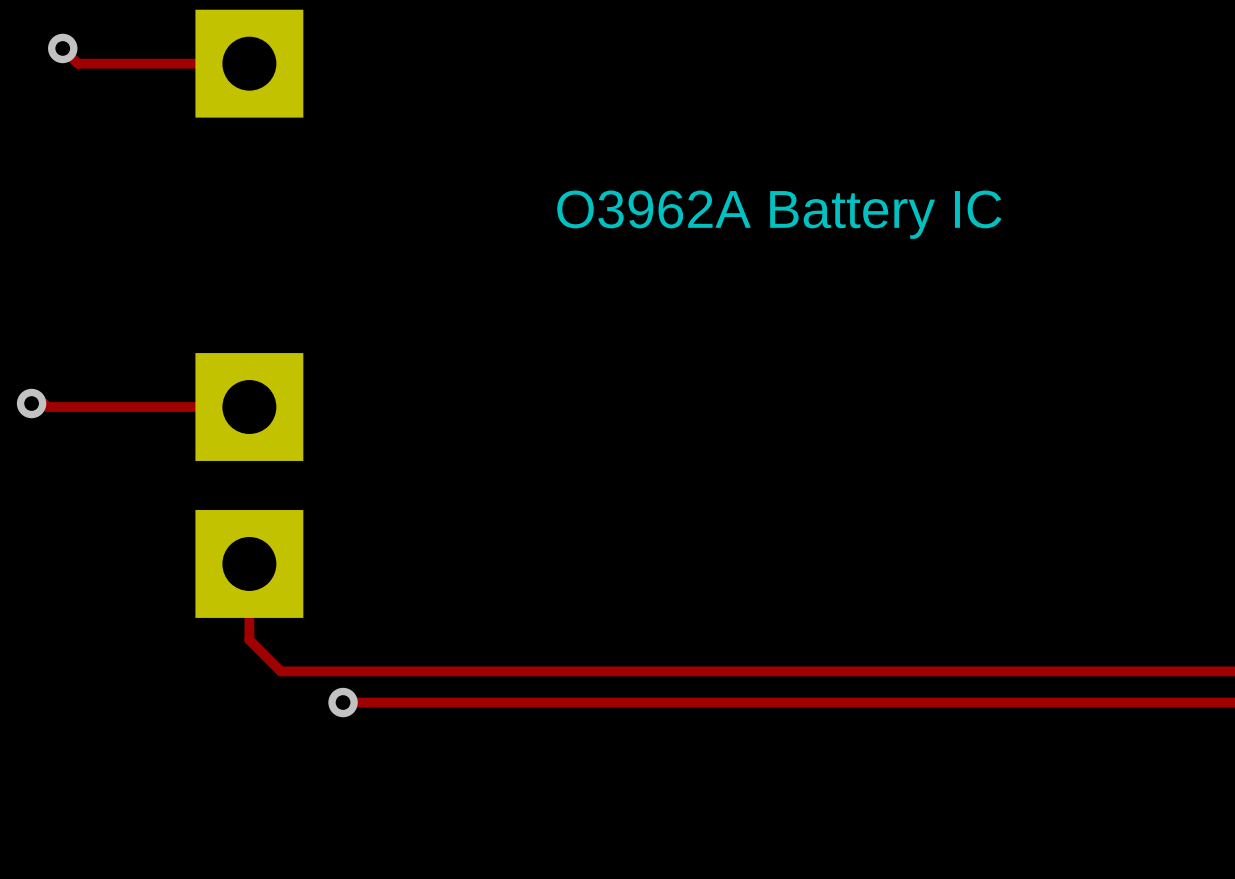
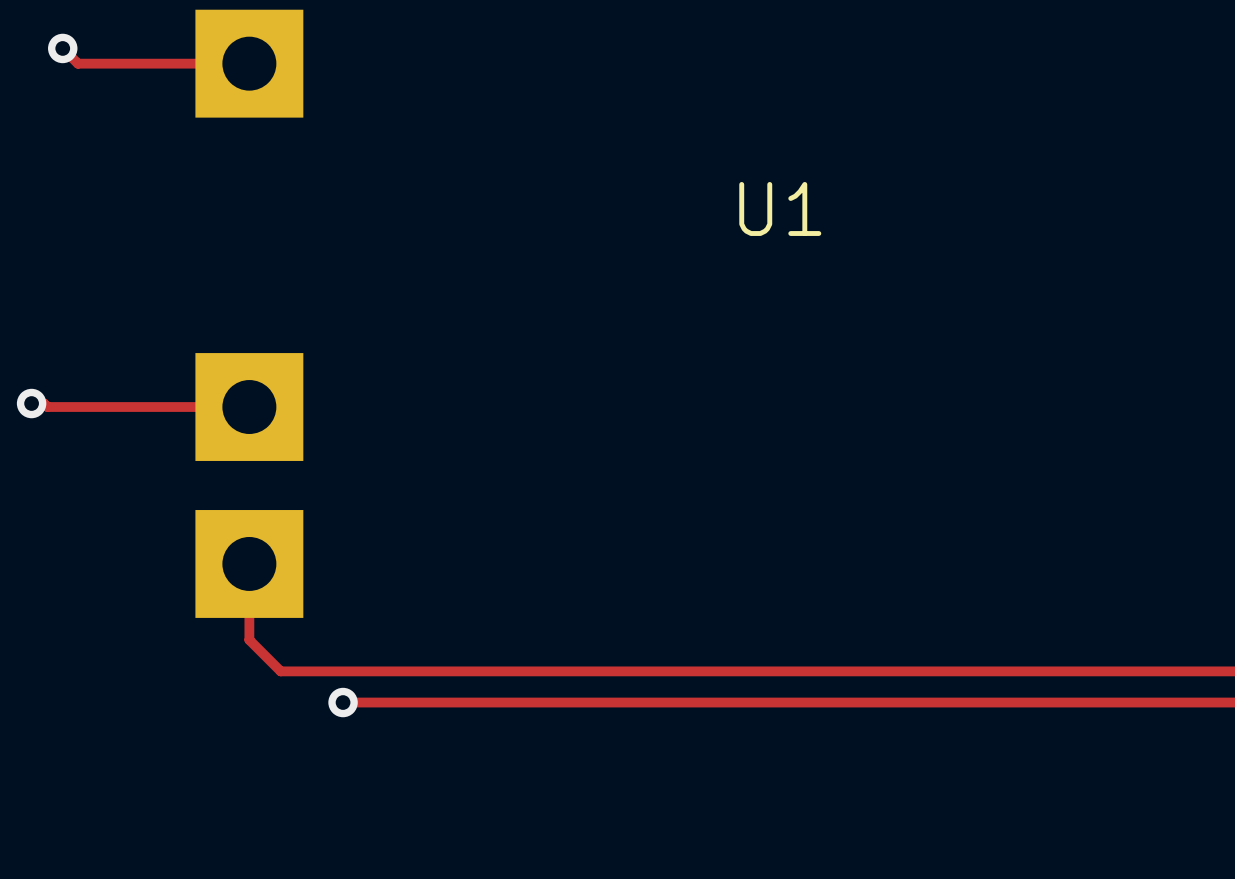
O3962A Battery IC name: O3962A Battery IC (779, 214) -> U1 (780, 208)

